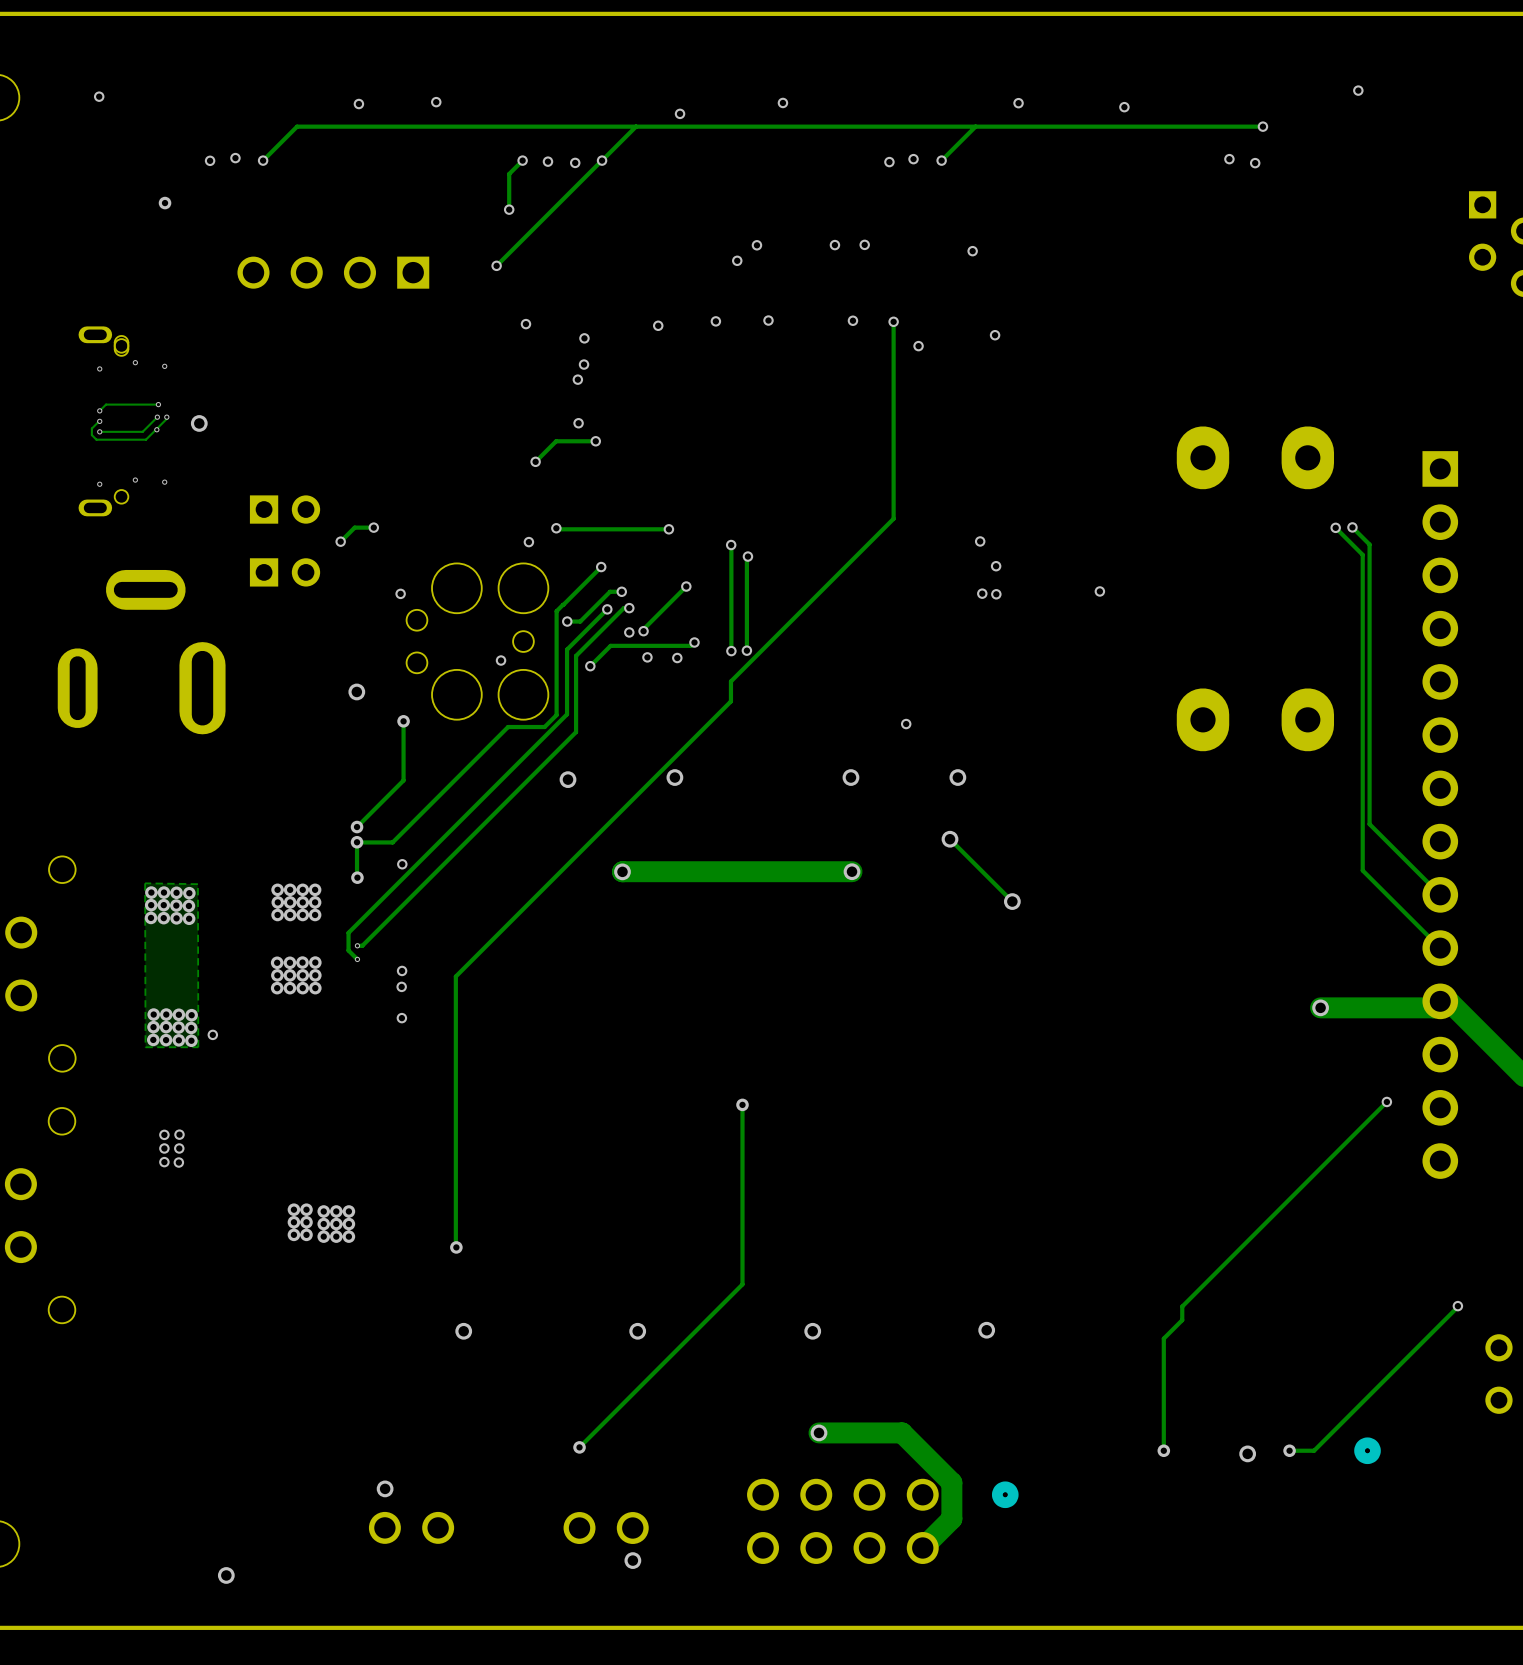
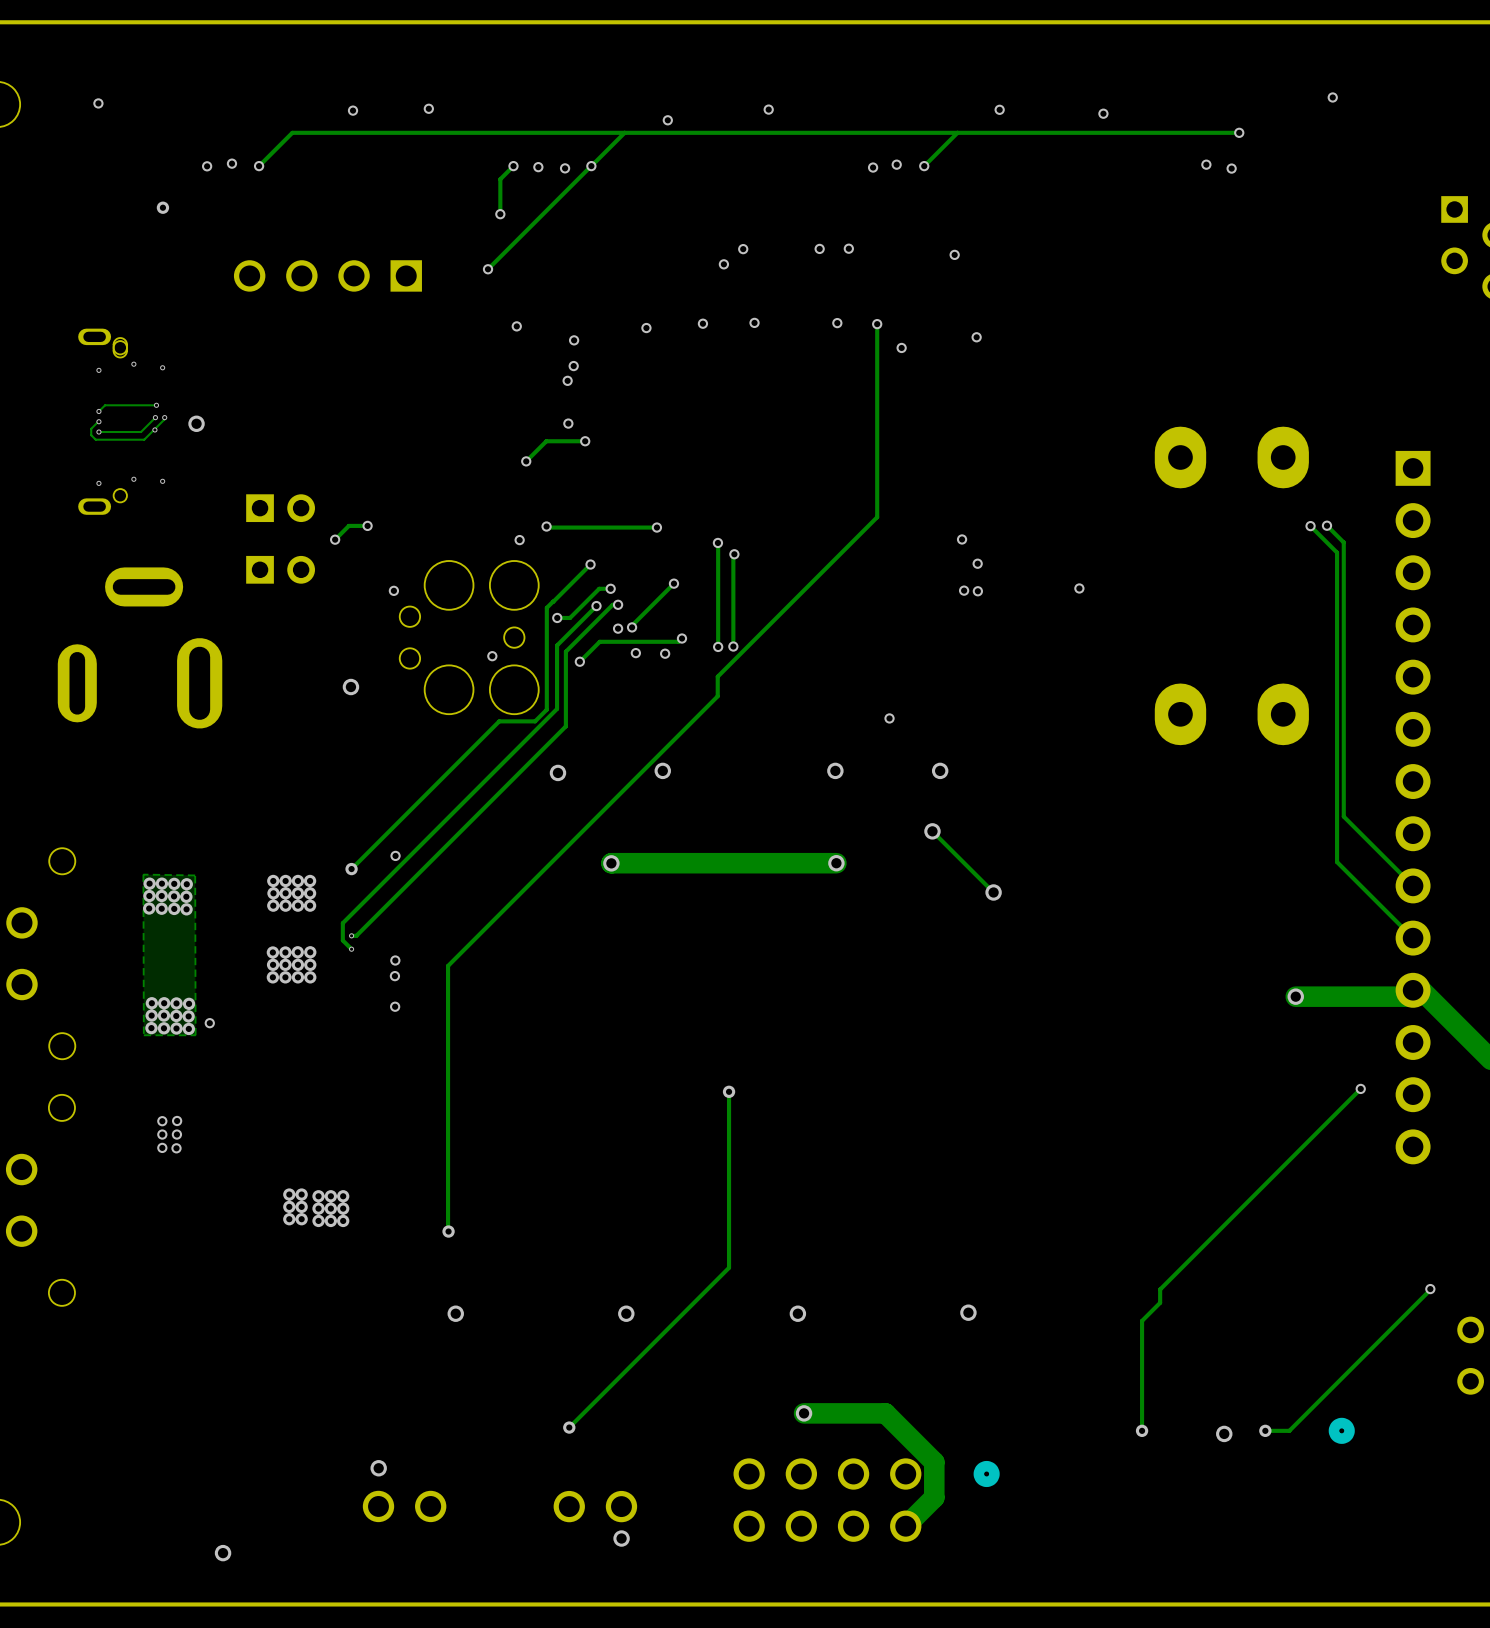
track: (403, 721) (403, 780) (357, 827) -> none
via: (403, 721) -> none
via: (357, 827) -> none
track: (357, 842) (392, 842) -> (351, 869) (386, 834)
track: (357, 842) (357, 877) -> none
via: (357, 842) -> none

